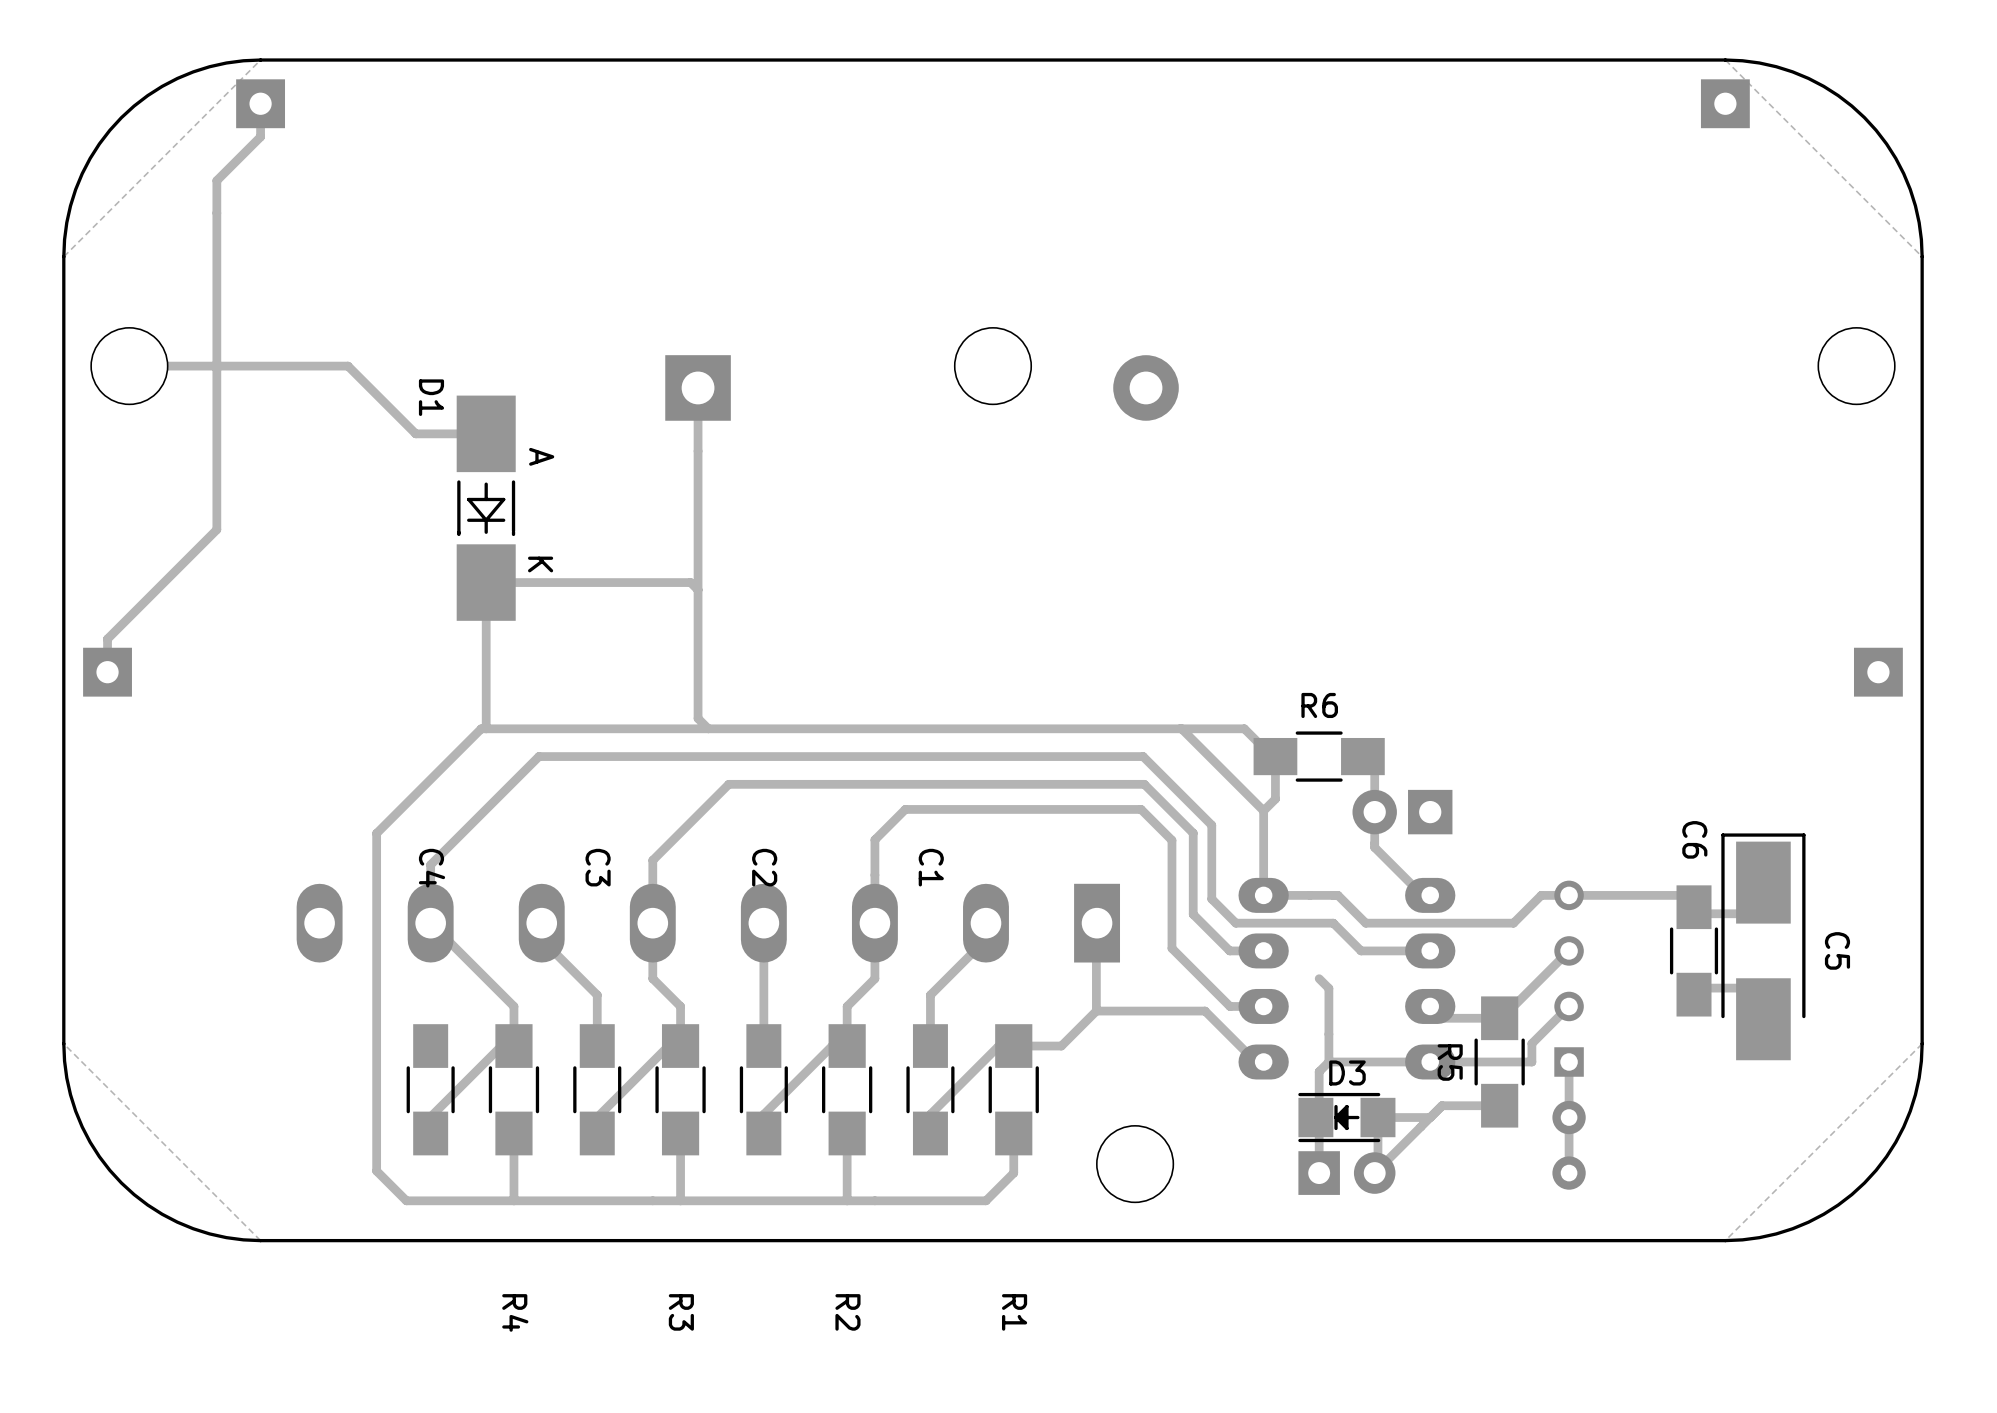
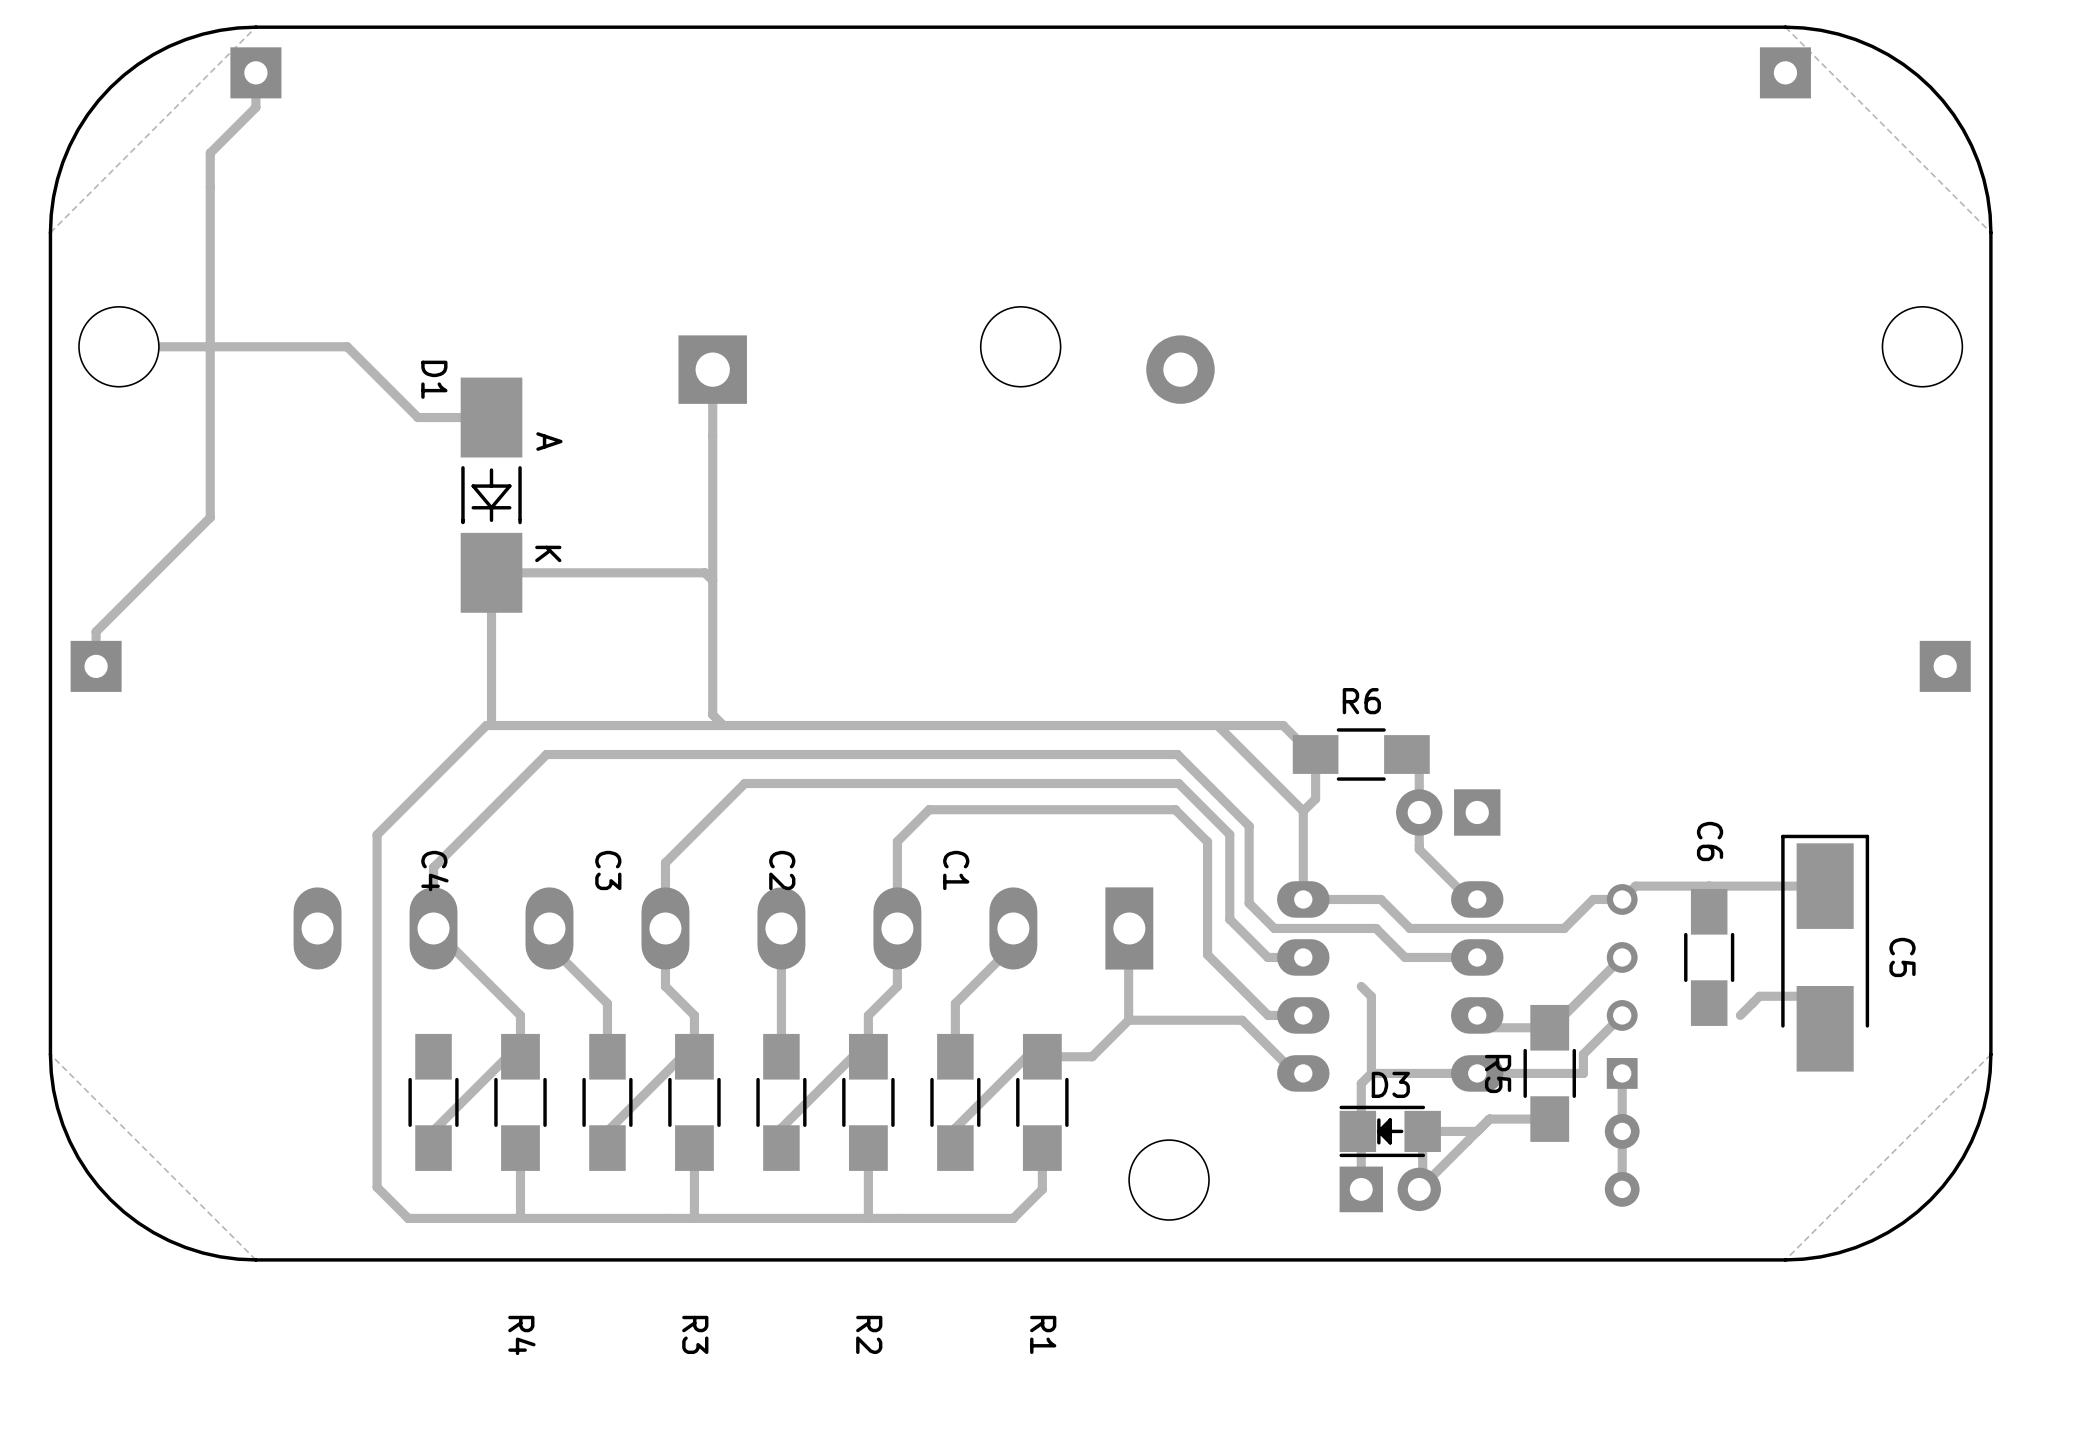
track: (1569, 895) (1682, 895) (1700, 913) (1749, 913) -> (1622, 899) (1635, 886) (1825, 886)
C6 position: (1694, 950) -> (1709, 957)

